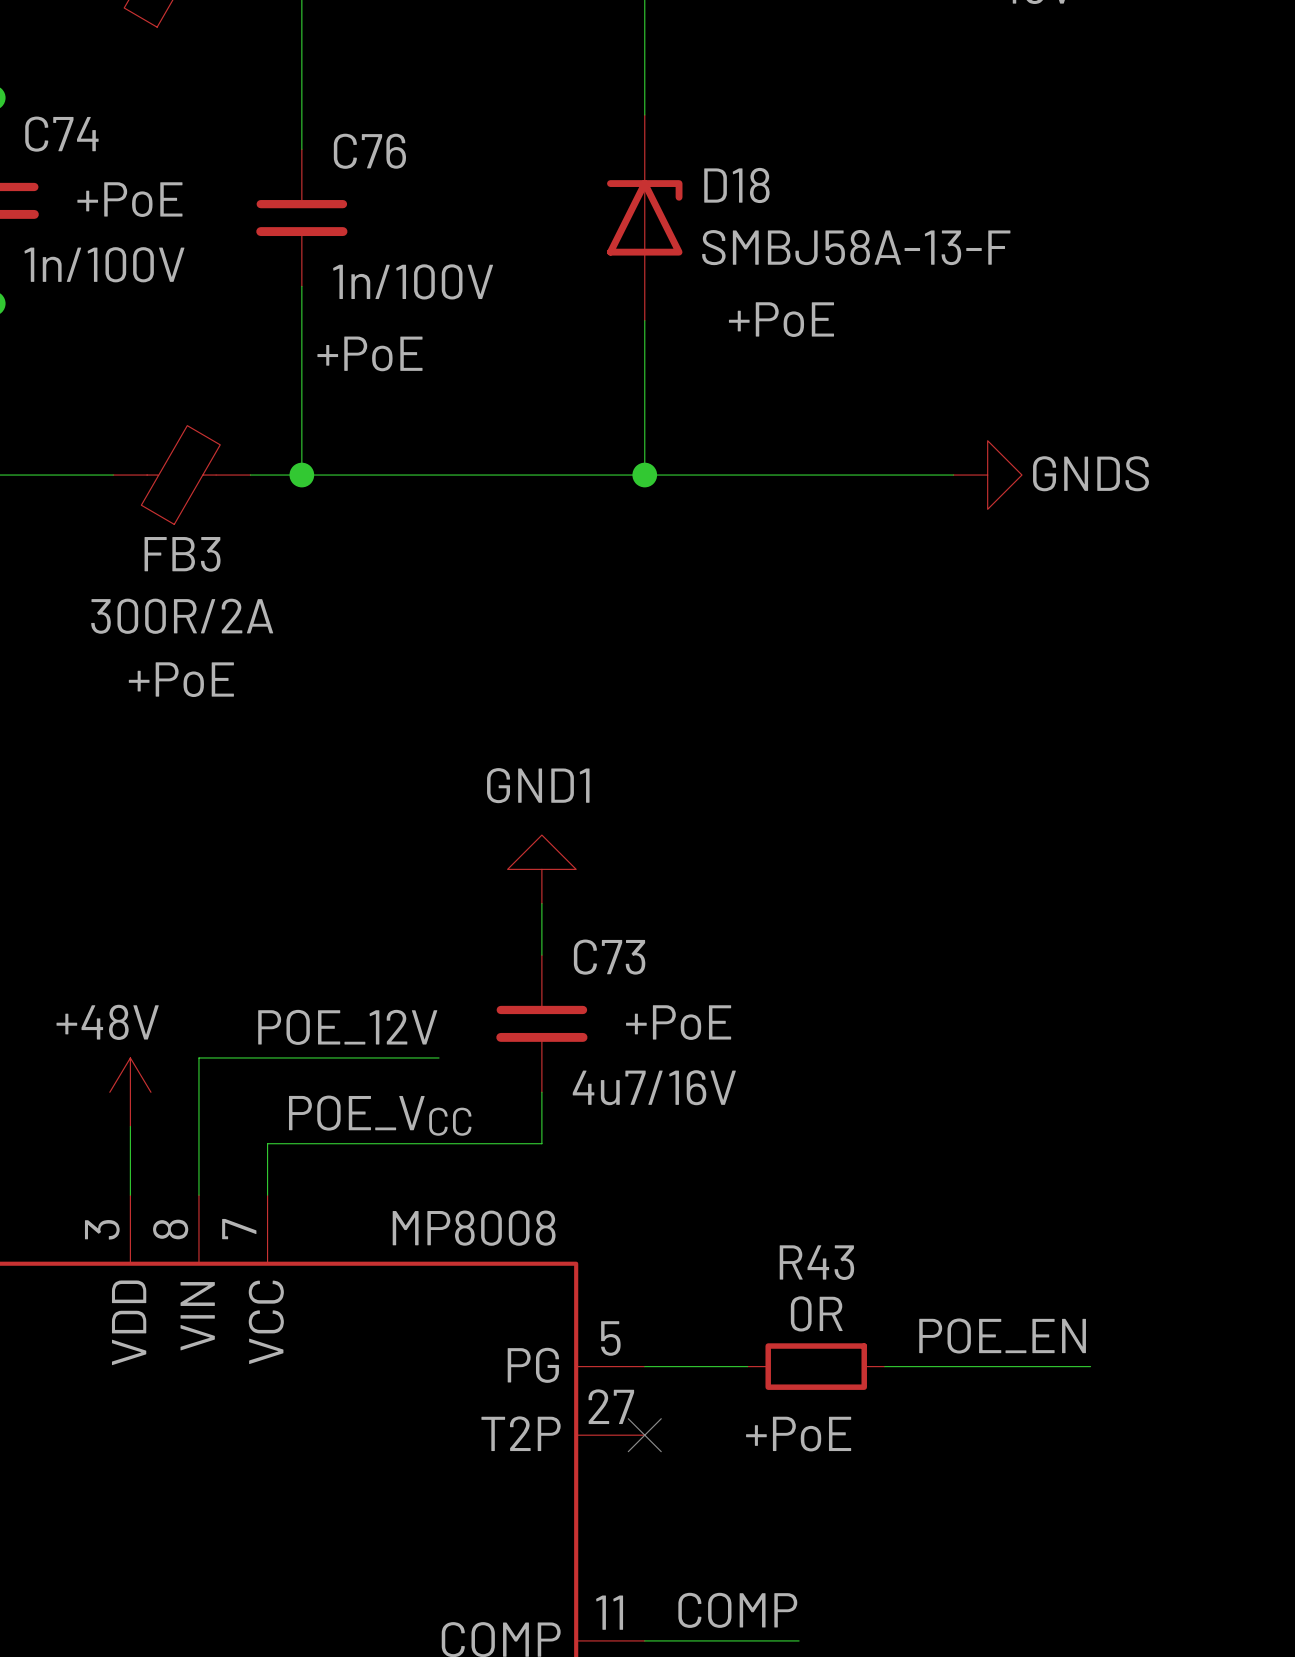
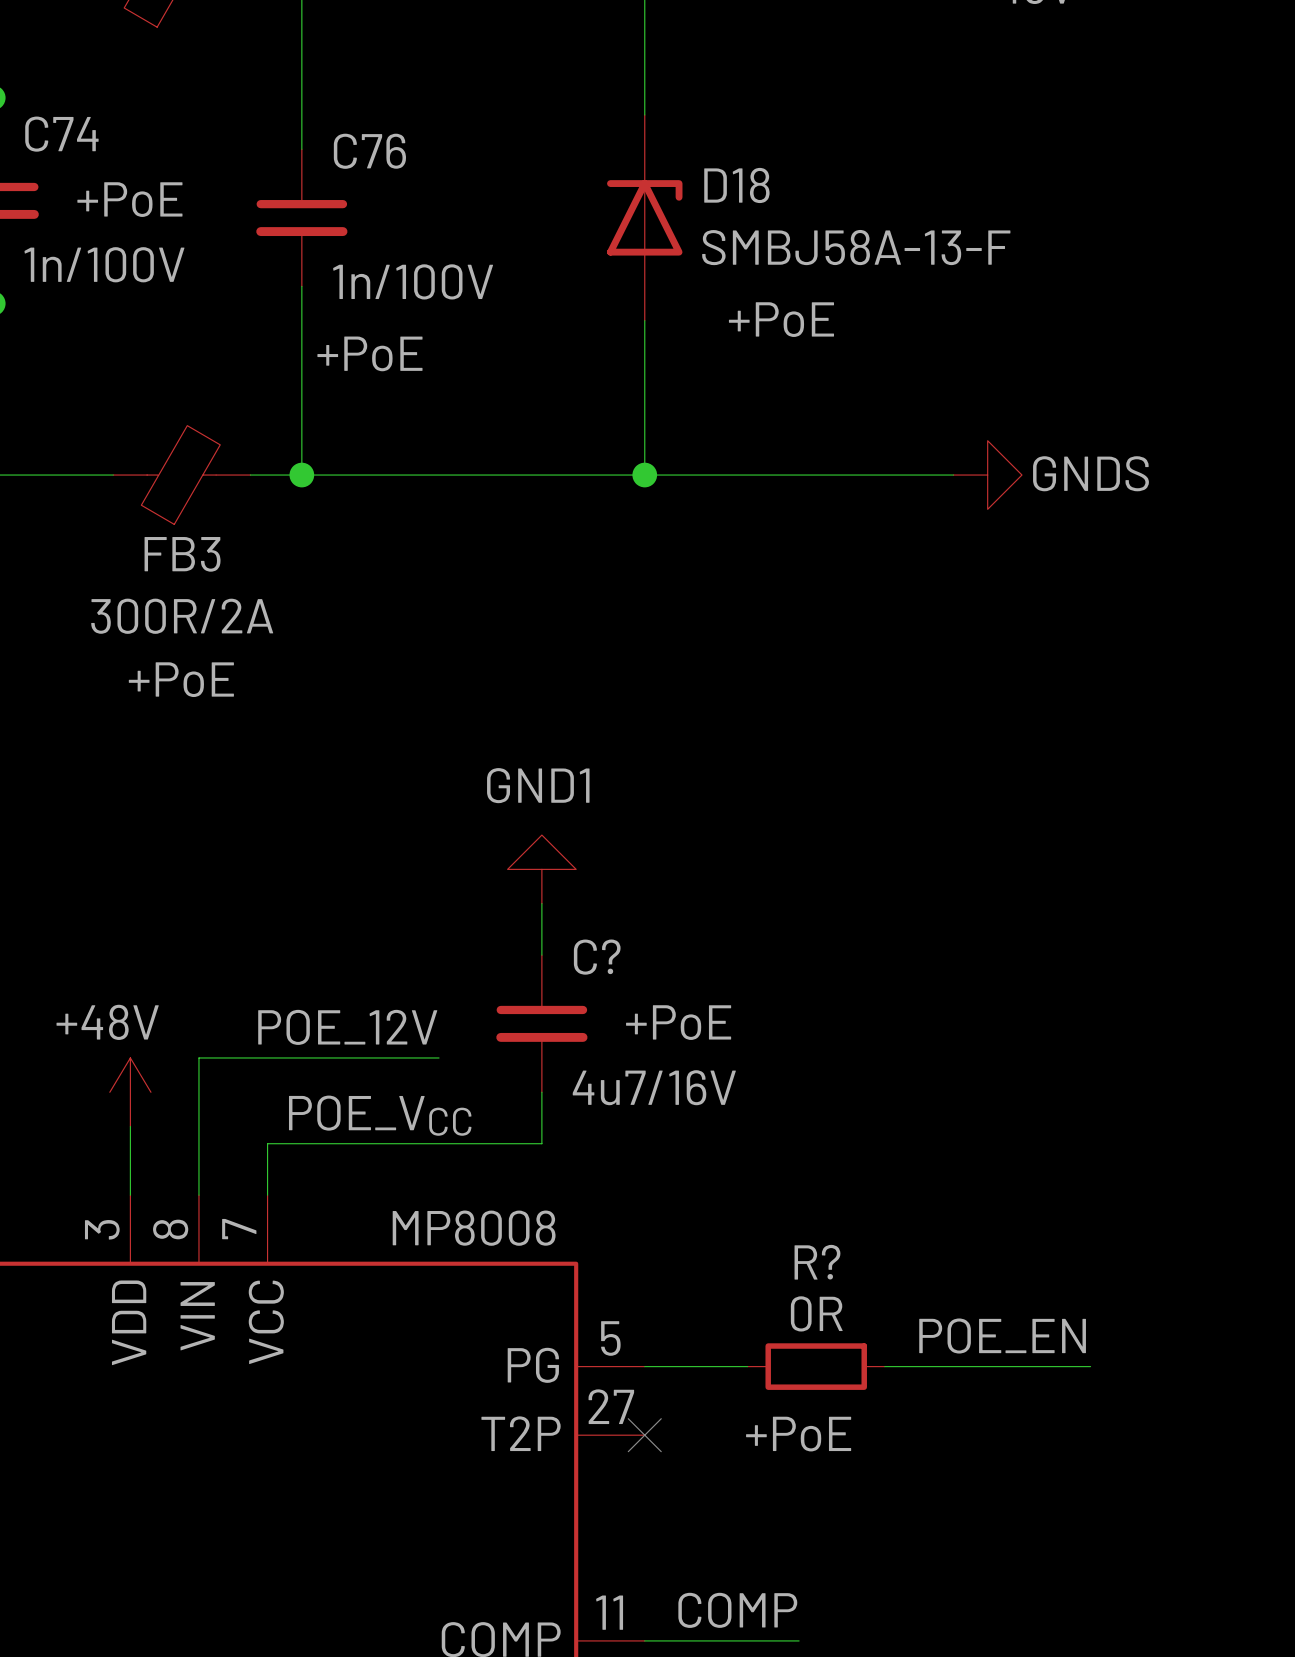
C73 name: C73 (609, 957) -> C? (597, 957)
R43 name: R43 (816, 1262) -> R? (817, 1262)

